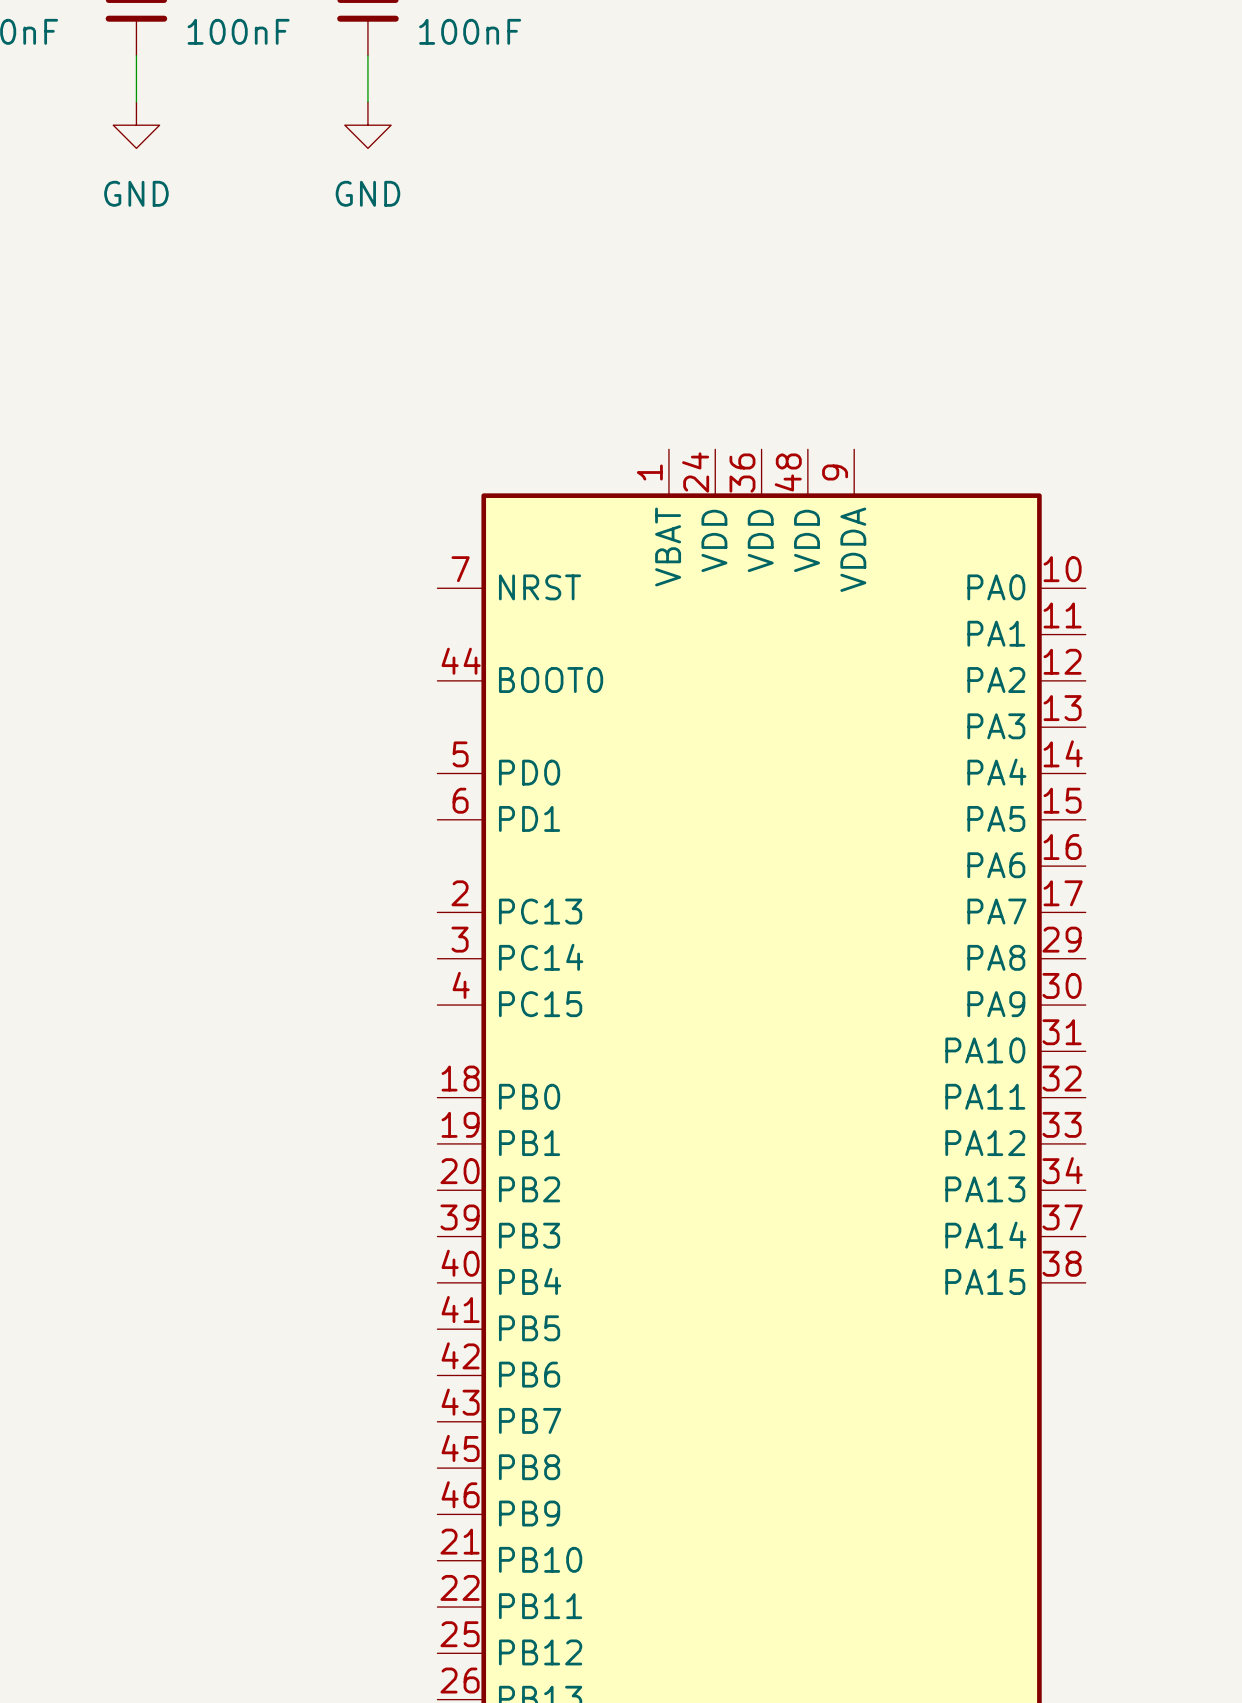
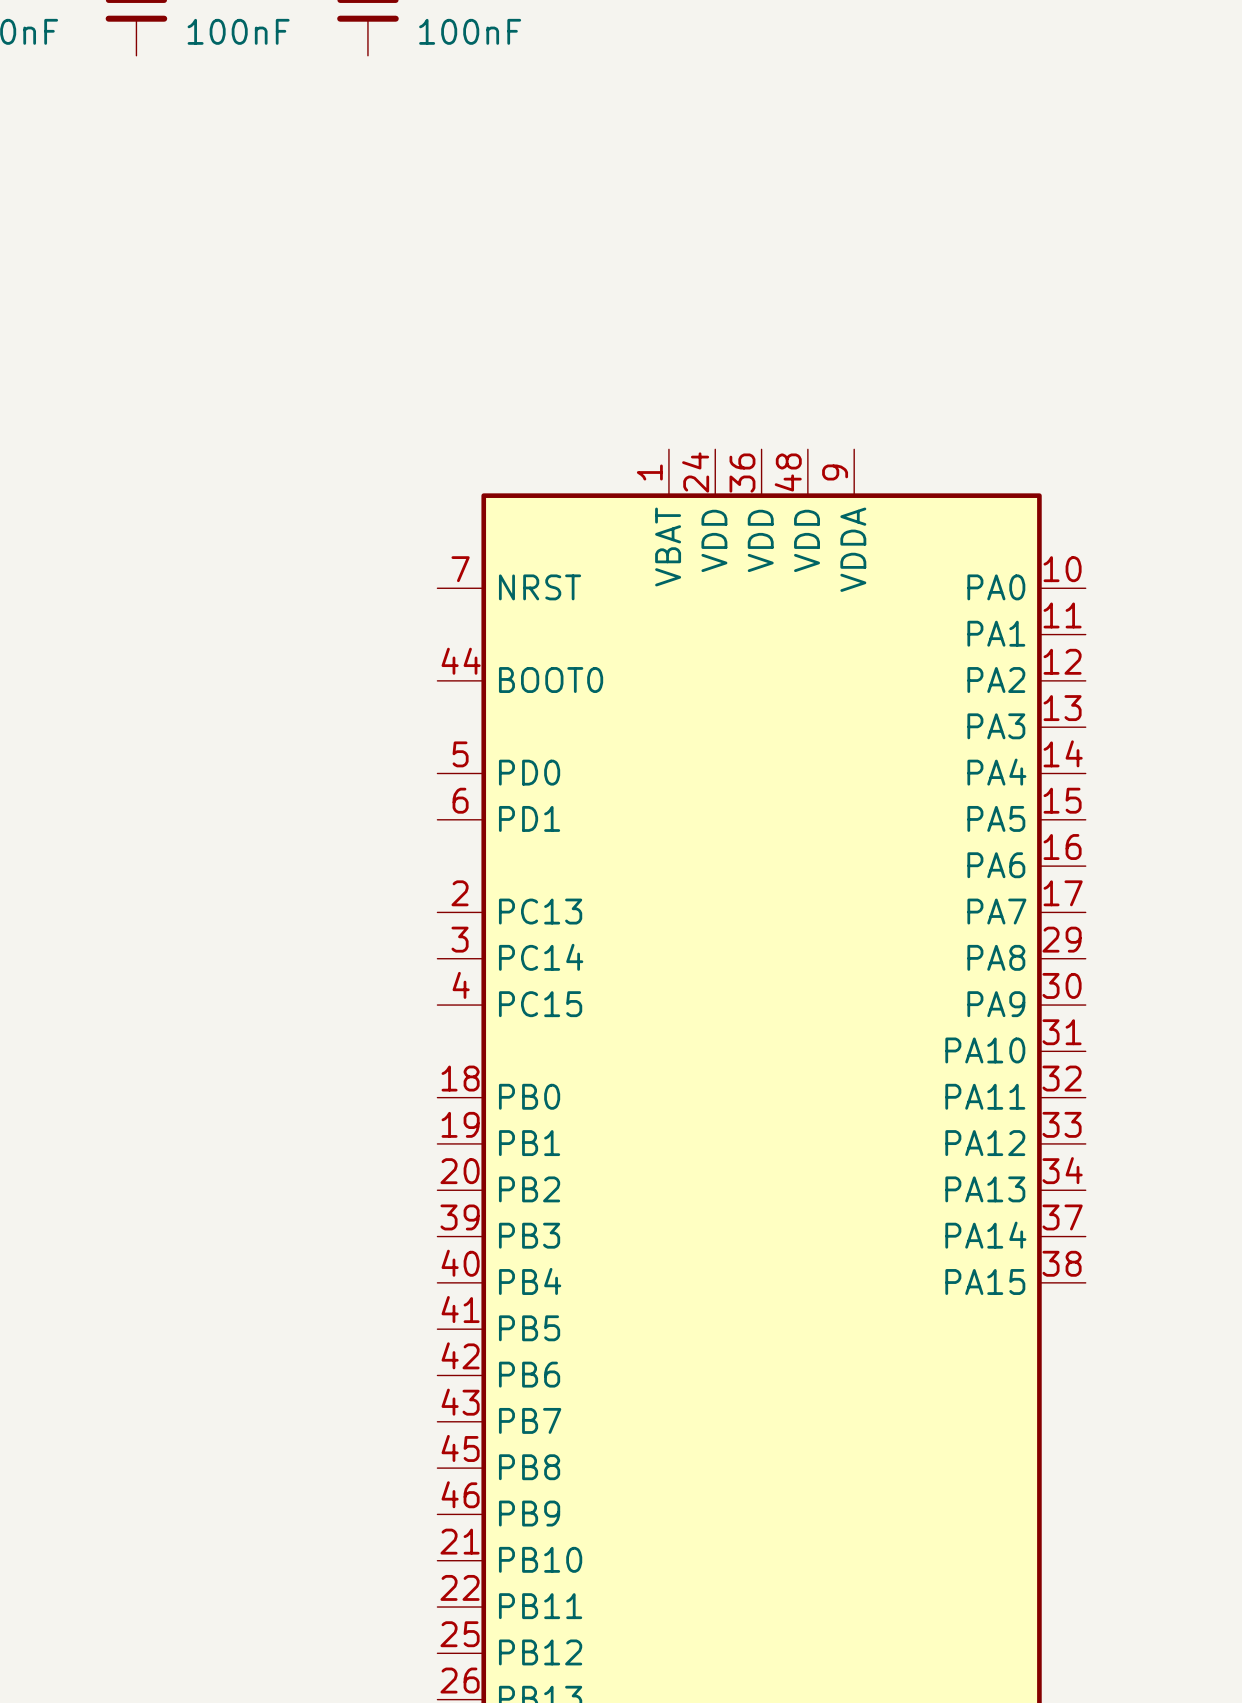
wire: (136, 55) (136, 102) -> none
wire: (367, 55) (367, 102) -> none
power symbol: GND (136, 125) -> none
power symbol: GND (367, 125) -> none

